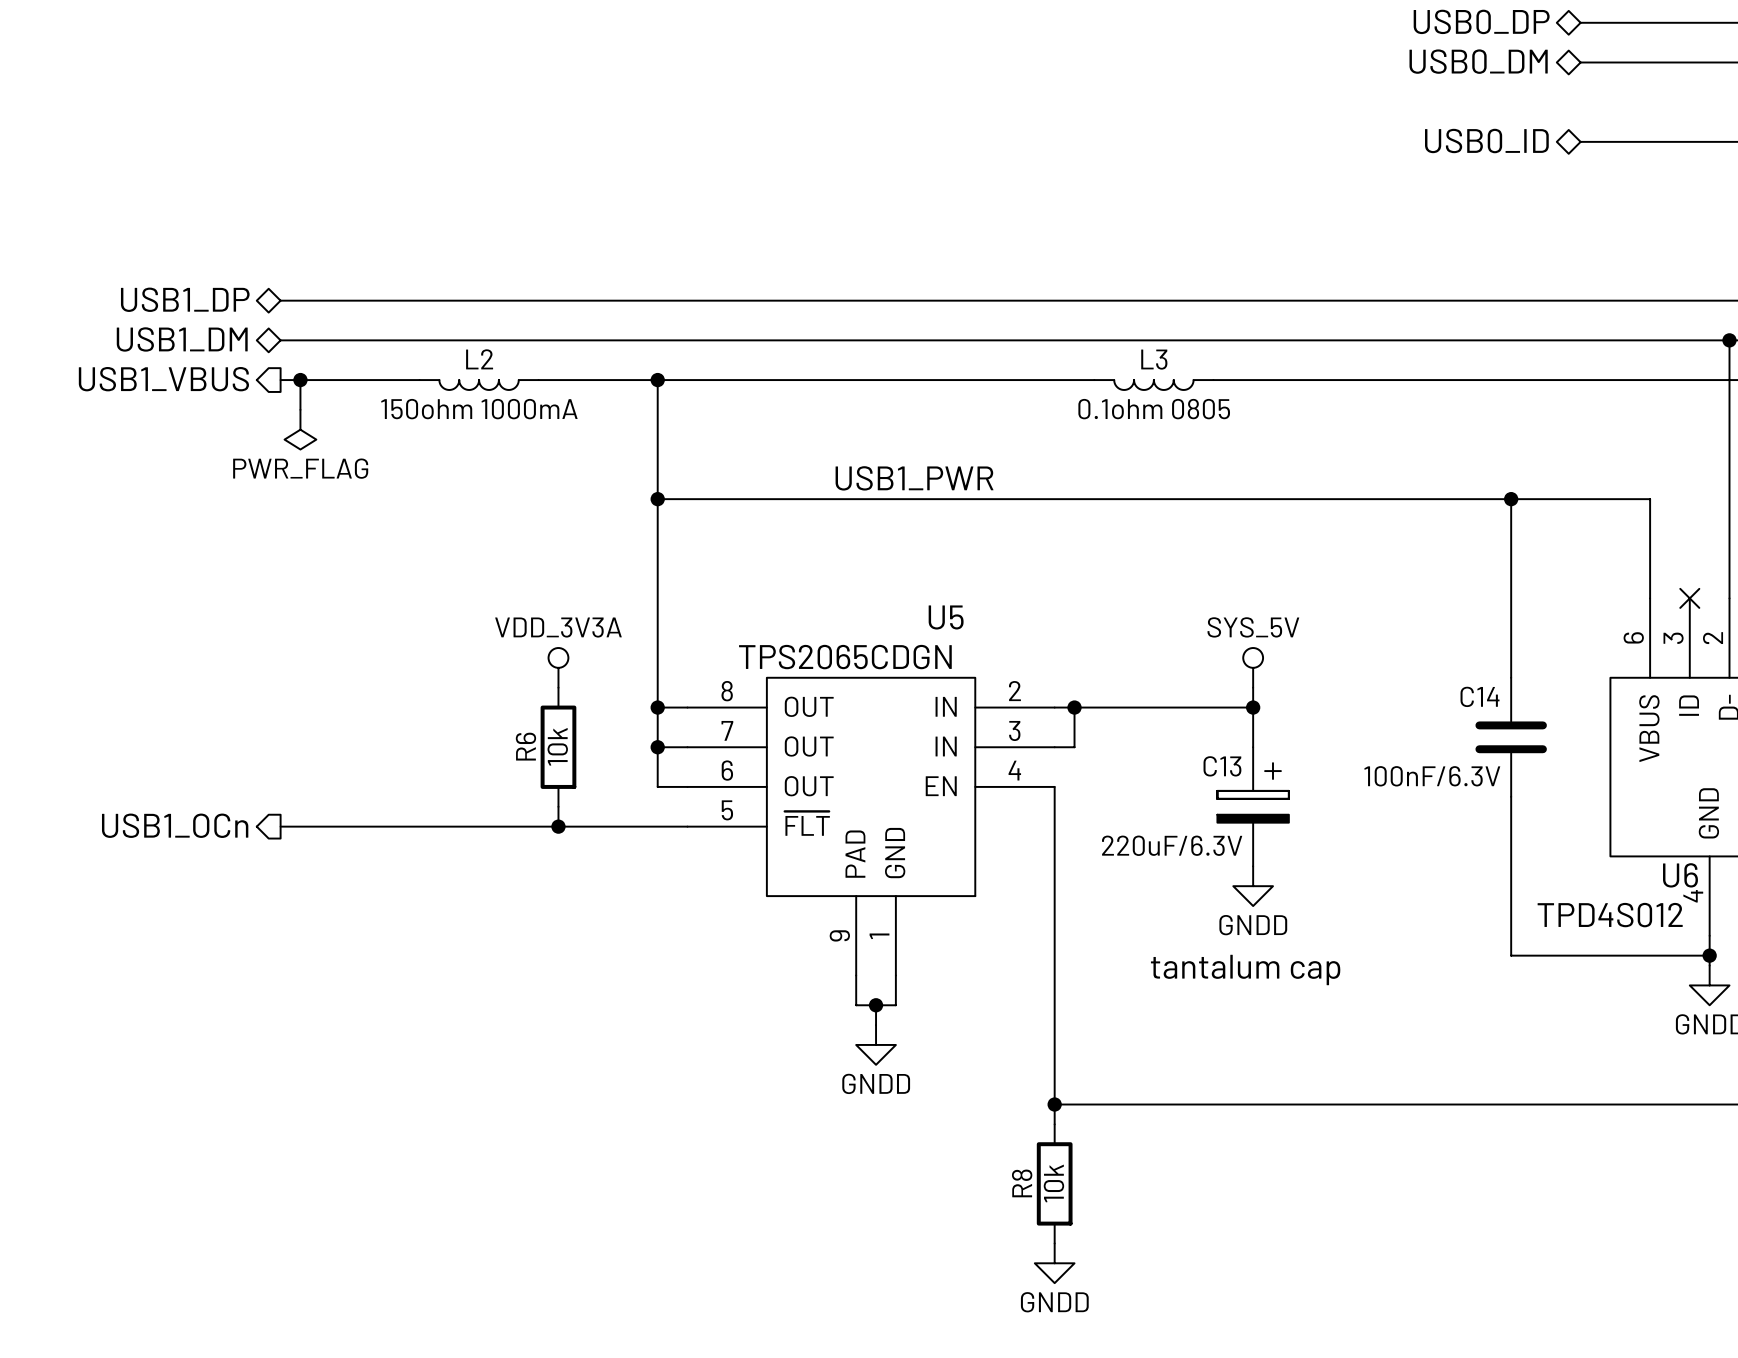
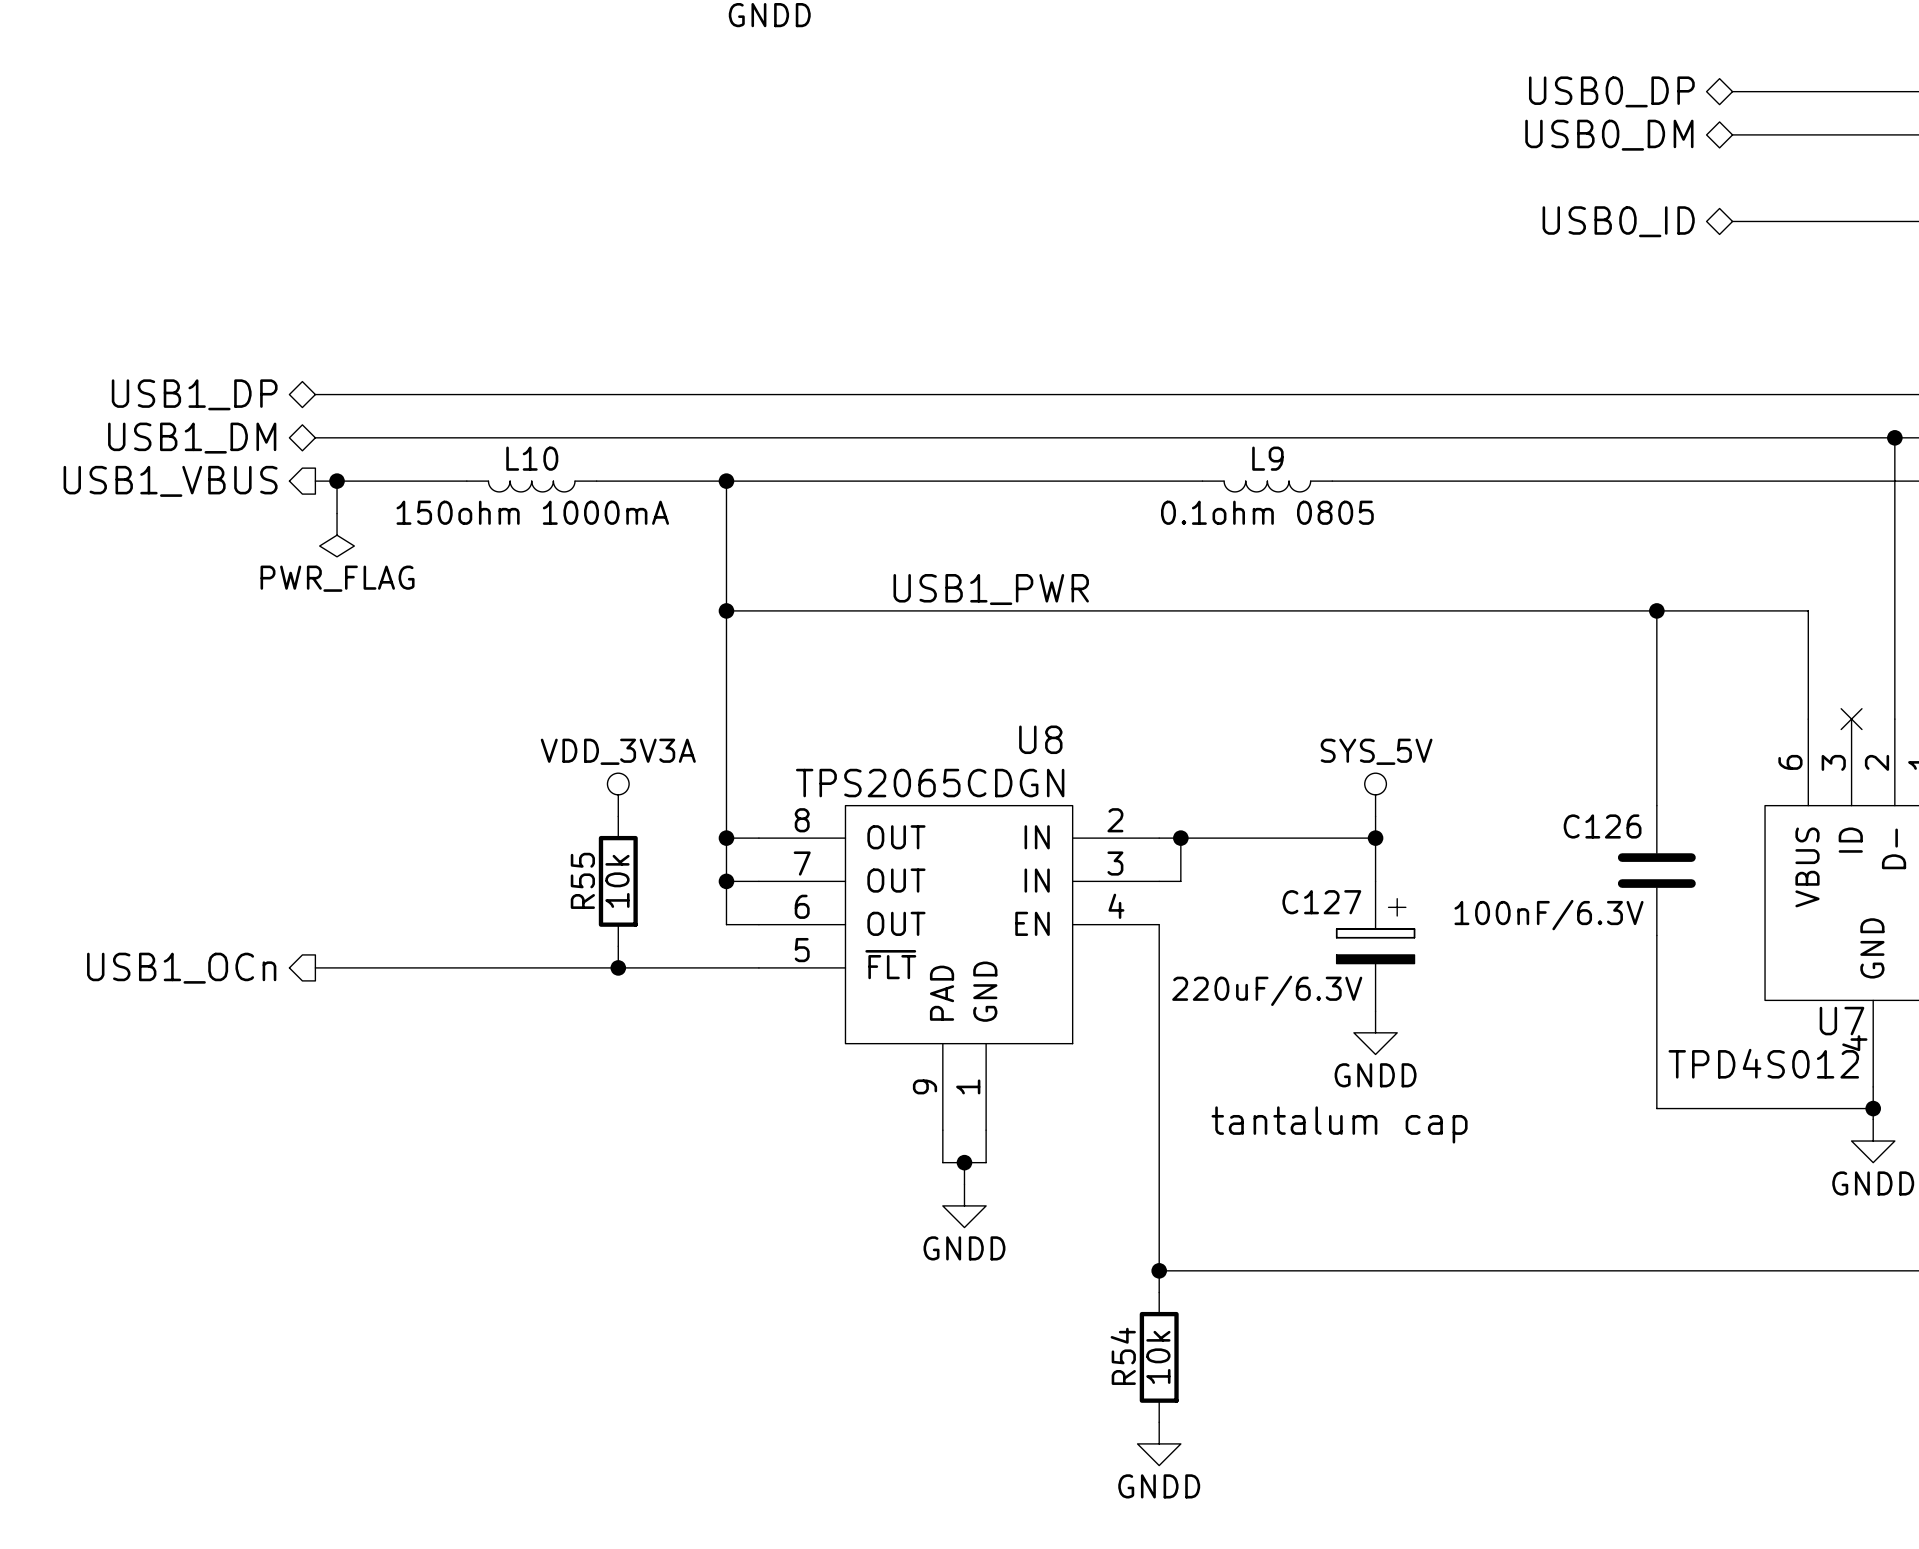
L2 name: L2 (479, 359) -> L10 (532, 458)
L3 name: L3 (1154, 359) -> L9 (1267, 458)
U5 name: U5 (946, 617) -> U8 (1040, 739)
C14 name: C14 (1480, 696) -> C126 (1602, 826)
R6 name: R6 (525, 746) -> R55 (582, 880)
C13 name: C13 (1222, 766) -> C127 (1321, 902)
U6 name: U6 (1680, 875) -> U7 (1841, 1021)
R8 name: R8 (1022, 1183) -> R54 (1123, 1356)

